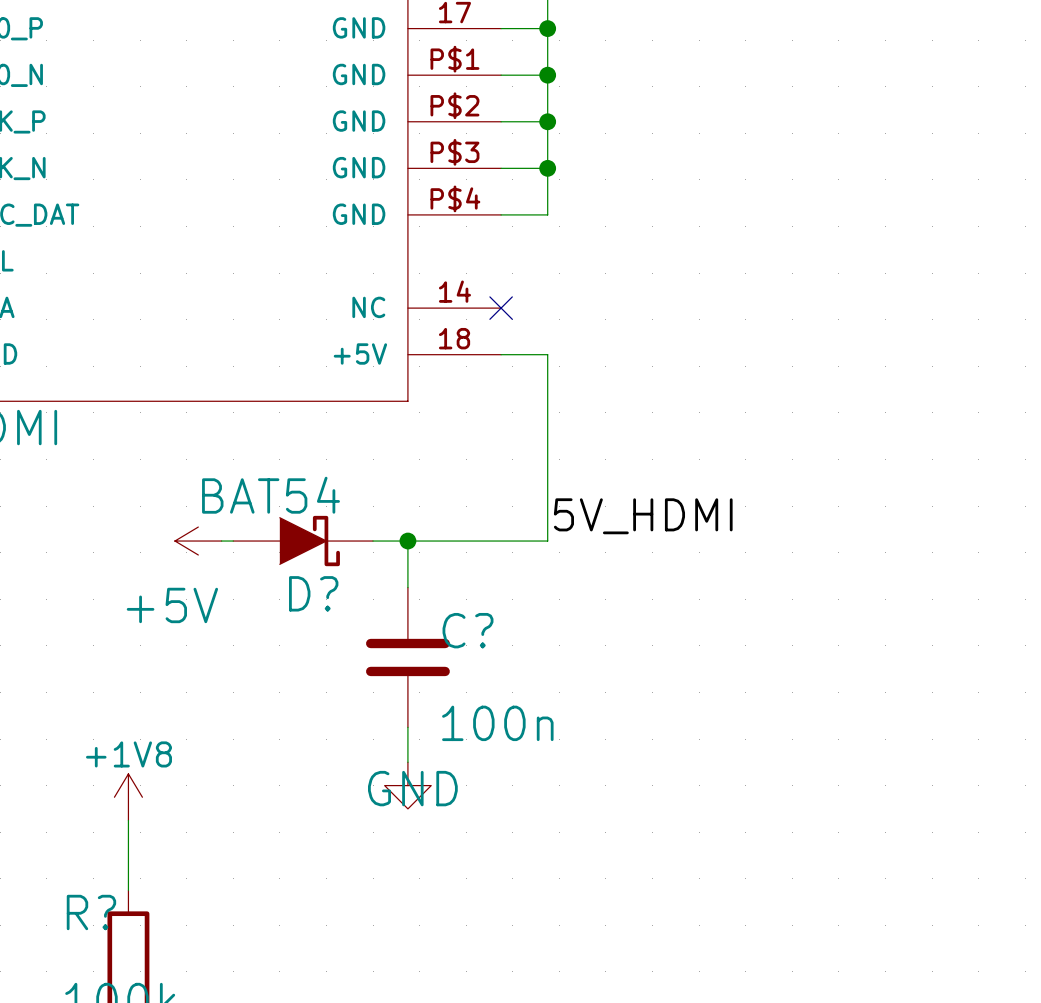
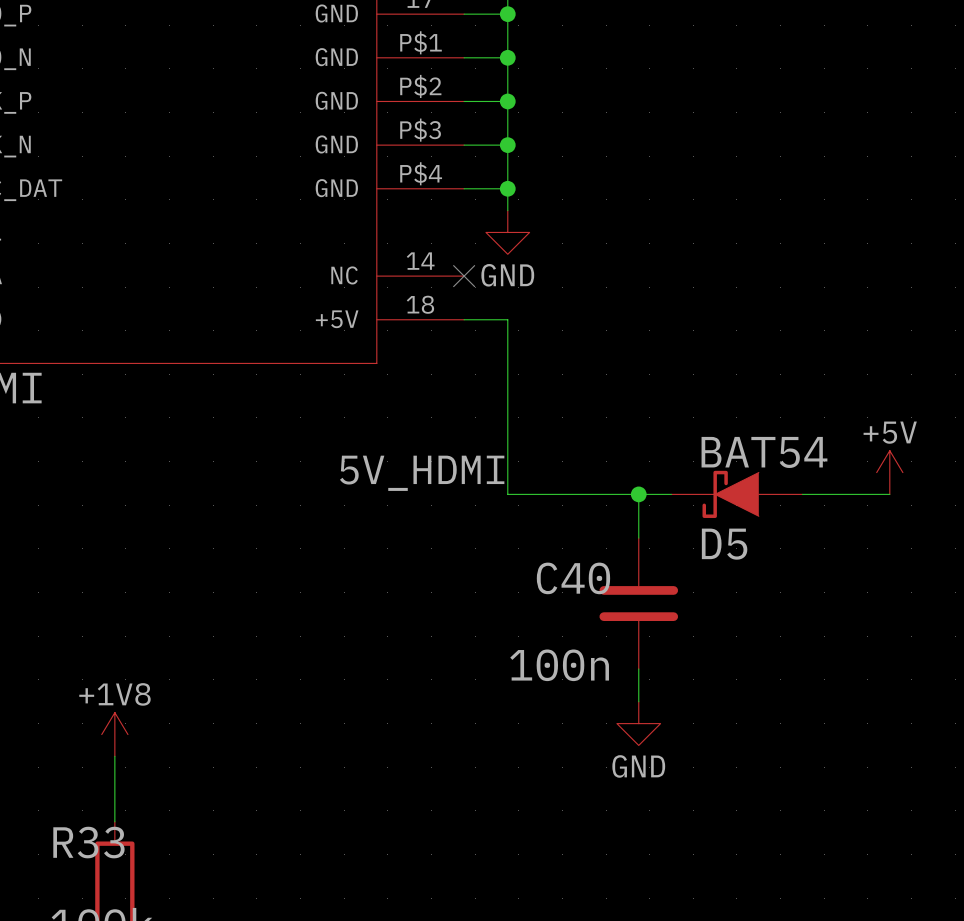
wire: none -> (507, 188) (507, 210)
junction: none -> (507, 188)
power symbol: none -> GND (507, 232)
label position: 5V_HDMI (643, 516) -> 5V_HDMI (422, 473)
power symbol: none -> +5V (889, 472)
power symbol: +5V (198, 541) -> none
wire: (221, 541) (233, 541) -> none
D?: BAT54 (303, 541) -> none
wire: (373, 541) (547, 541) -> (671, 494) (507, 494)
wire: (407, 541) (407, 587) -> (638, 494) (638, 538)
junction: (407, 541) -> none
junction: none -> (638, 494)
D5: none -> BAT54 (736, 494)
wire: none -> (802, 494) (889, 494)
C?: 100n (407, 657) -> none
C40: none -> 100n (638, 603)
wire: (407, 727) (407, 762) -> (638, 669) (638, 701)
power symbol: GND (407, 785) -> none
power symbol: none -> GND (638, 723)
R? name: R? (91, 912) -> R33 (88, 842)

